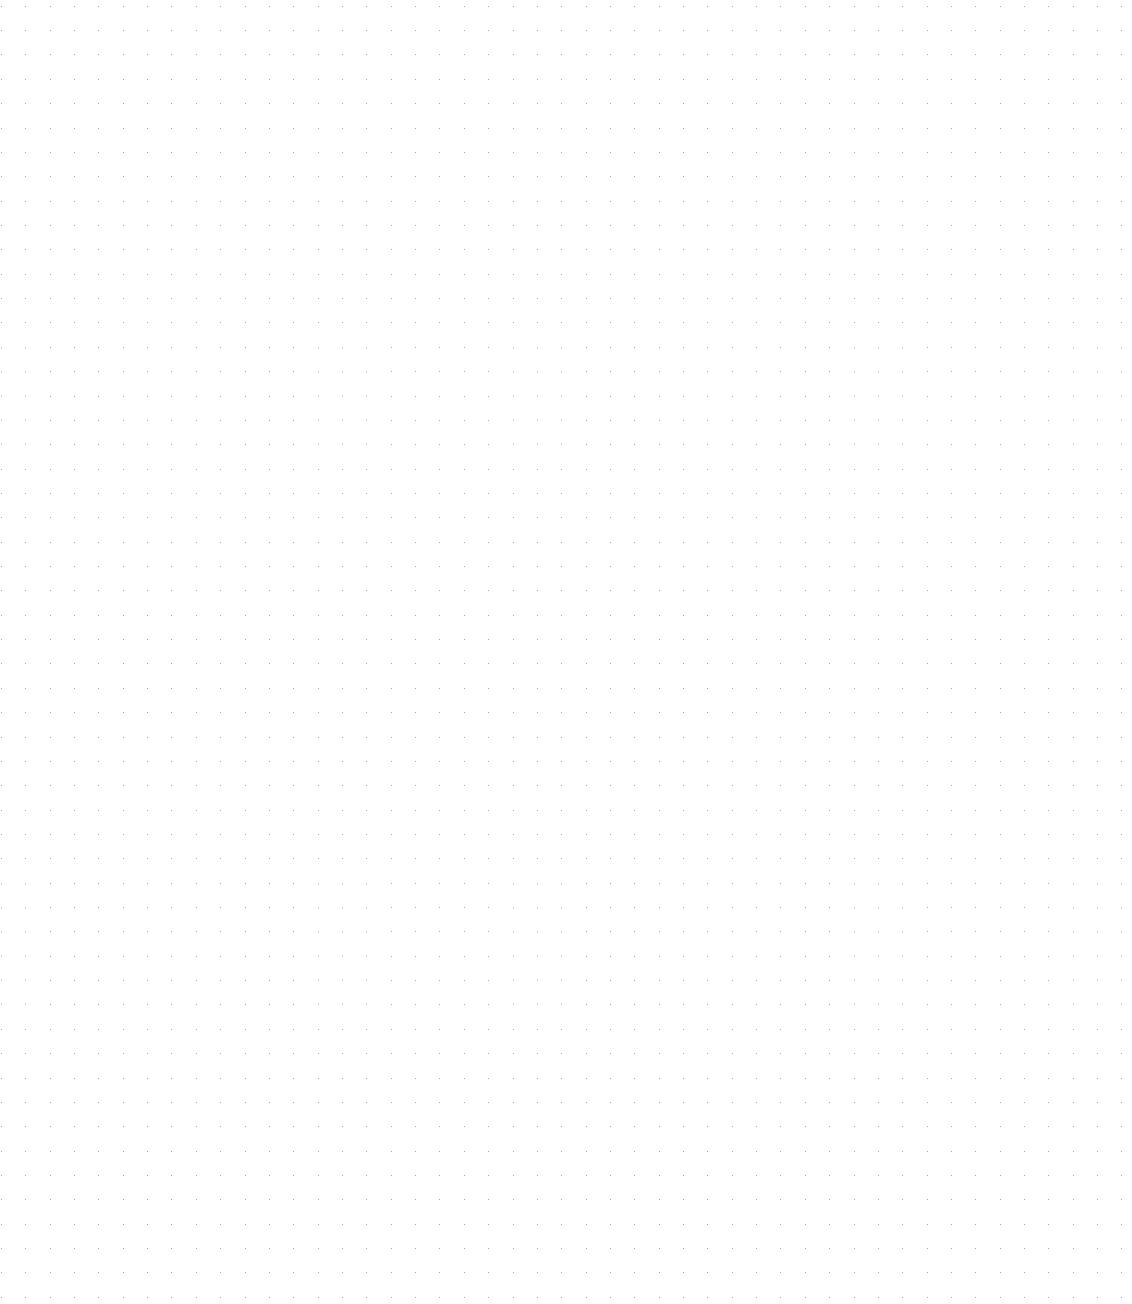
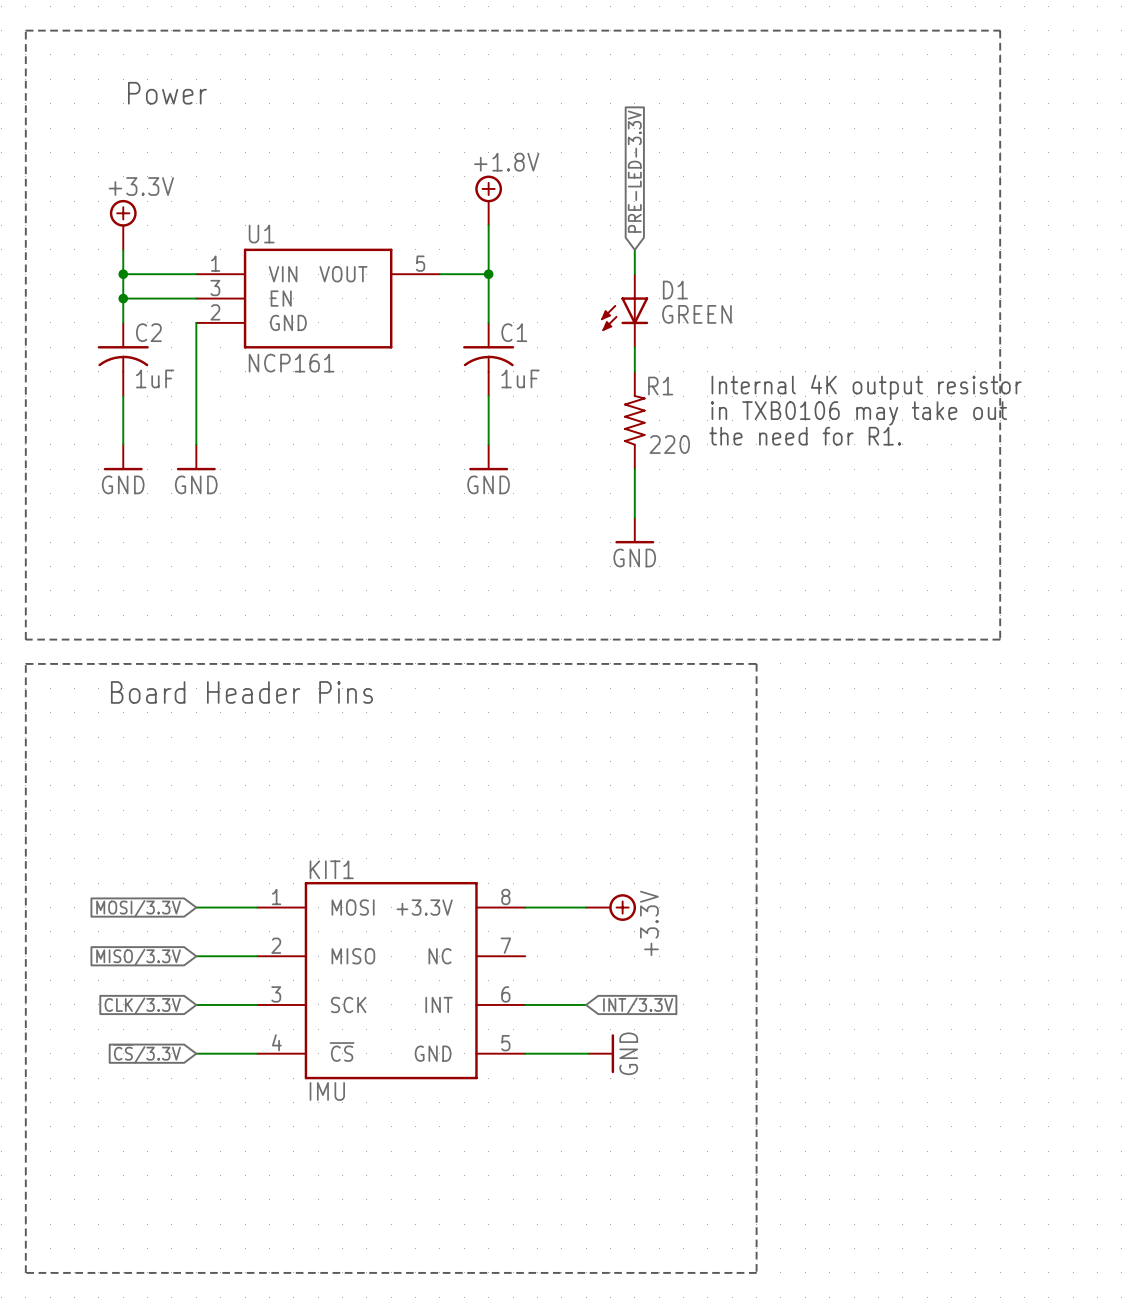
line: none -> (25, 30) (1000, 30) (1000, 639) (25, 639) (25, 30)
text: none -> Power (167, 93)
global label: none -> PRE-LED-3.3V (634, 171)
power symbol: none -> +1.8V (488, 200)
power symbol: none -> +3.3V (123, 224)
wire: none -> (488, 225) (488, 322)
wire: none -> (123, 249) (123, 322)
wire: none -> (634, 249) (634, 274)
wire: none -> (123, 274) (196, 274)
junction: none -> (123, 274)
wire: none -> (439, 274) (488, 274)
junction: none -> (488, 274)
wire: none -> (123, 298) (196, 298)
junction: none -> (123, 298)
U1: none -> NCP161 (318, 298)
D1: none -> GREEN (624, 310)
wire: none -> (196, 322) (196, 444)
wire: none -> (634, 347) (634, 371)
C2: none -> 1uF (123, 359)
C1: none -> 1uF (488, 359)
text: none -> Internal 4K output resistor (866, 387)
wire: none -> (123, 396) (123, 444)
wire: none -> (488, 396) (488, 444)
text: none -> in TXB0106 may take out (858, 413)
R1: none -> 220 (634, 420)
text: none -> the need for R1. (805, 436)
power symbol: none -> GND (123, 457)
power symbol: none -> GND (196, 457)
power symbol: none -> GND (488, 457)
wire: none -> (634, 469) (634, 517)
power symbol: none -> GND (634, 530)
line: none -> (25, 663) (25, 1272) (756, 1272) (756, 663) (25, 663)
text: none -> Board Header Pins (241, 692)
wire: none -> (196, 907) (257, 907)
wire: none -> (525, 907) (586, 907)
power symbol: none -> +3.3V (611, 907)
global label: none -> MOSI/3.3V (138, 908)
wire: none -> (196, 956) (257, 956)
global label: none -> MISO/3.3V (138, 957)
KIT1: none -> IMU (391, 980)
wire: none -> (196, 1004) (257, 1004)
wire: none -> (525, 1004) (586, 1004)
global label: none -> CLK/3.3V (142, 1006)
global label: none -> INT/3.3V (638, 1006)
global label: none -> ~{CS}/3.3V (146, 1053)
wire: none -> (196, 1053) (257, 1053)
wire: none -> (525, 1053) (588, 1053)
power symbol: none -> GND (601, 1053)

